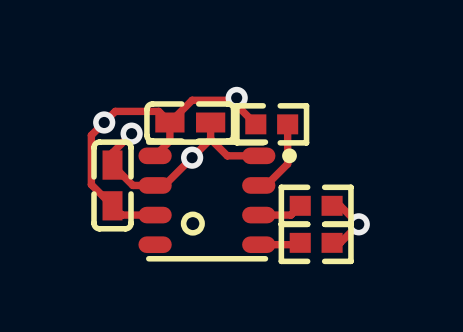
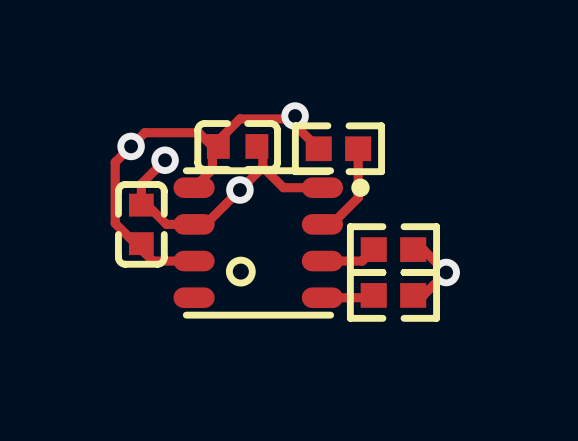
part footprint: [144, 101, 237, 144] -> [194, 120, 281, 173]
part footprint: [91, 139, 134, 232] -> [115, 181, 168, 268]

